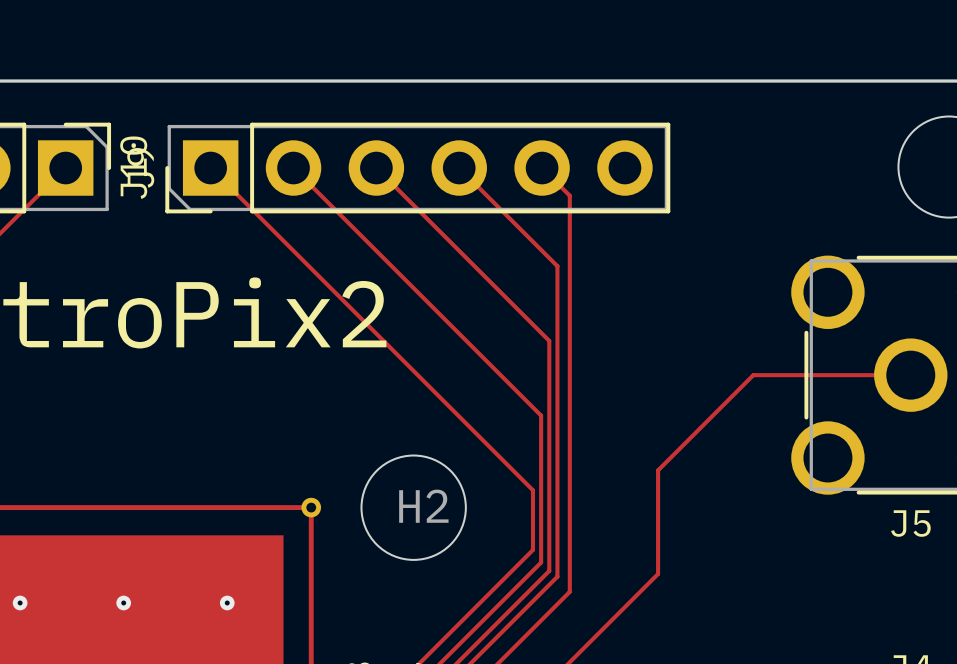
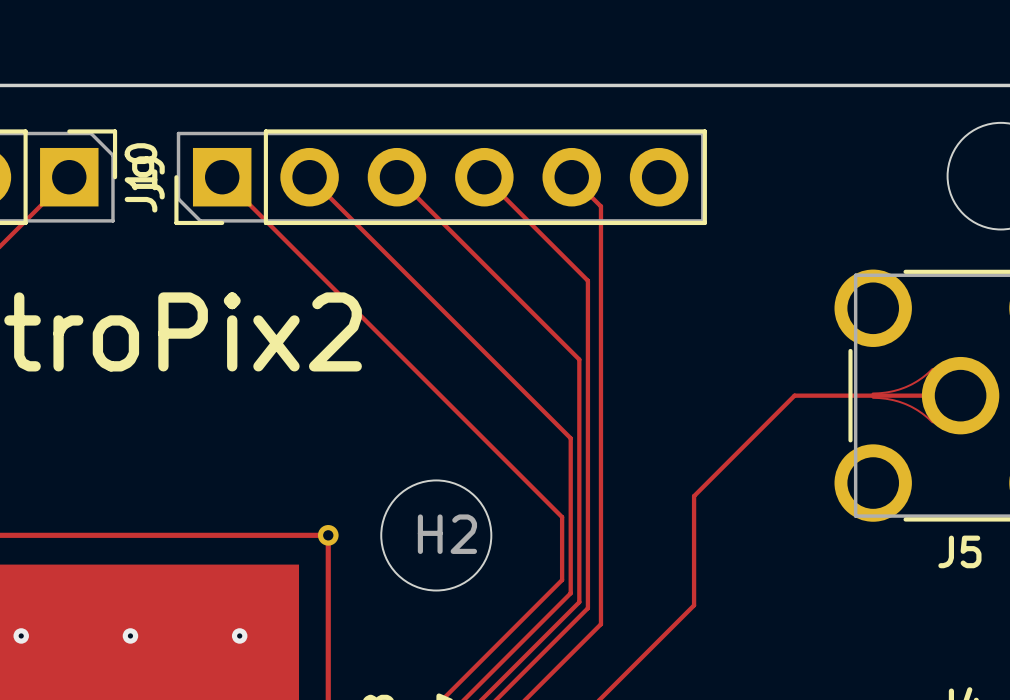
top zone outline: none -> (932, 368) (979, 395) (932, 422) (922, 413) (905, 404) (886, 398) (872, 397) (872, 393) (892, 391) (911, 384) (932, 368)

